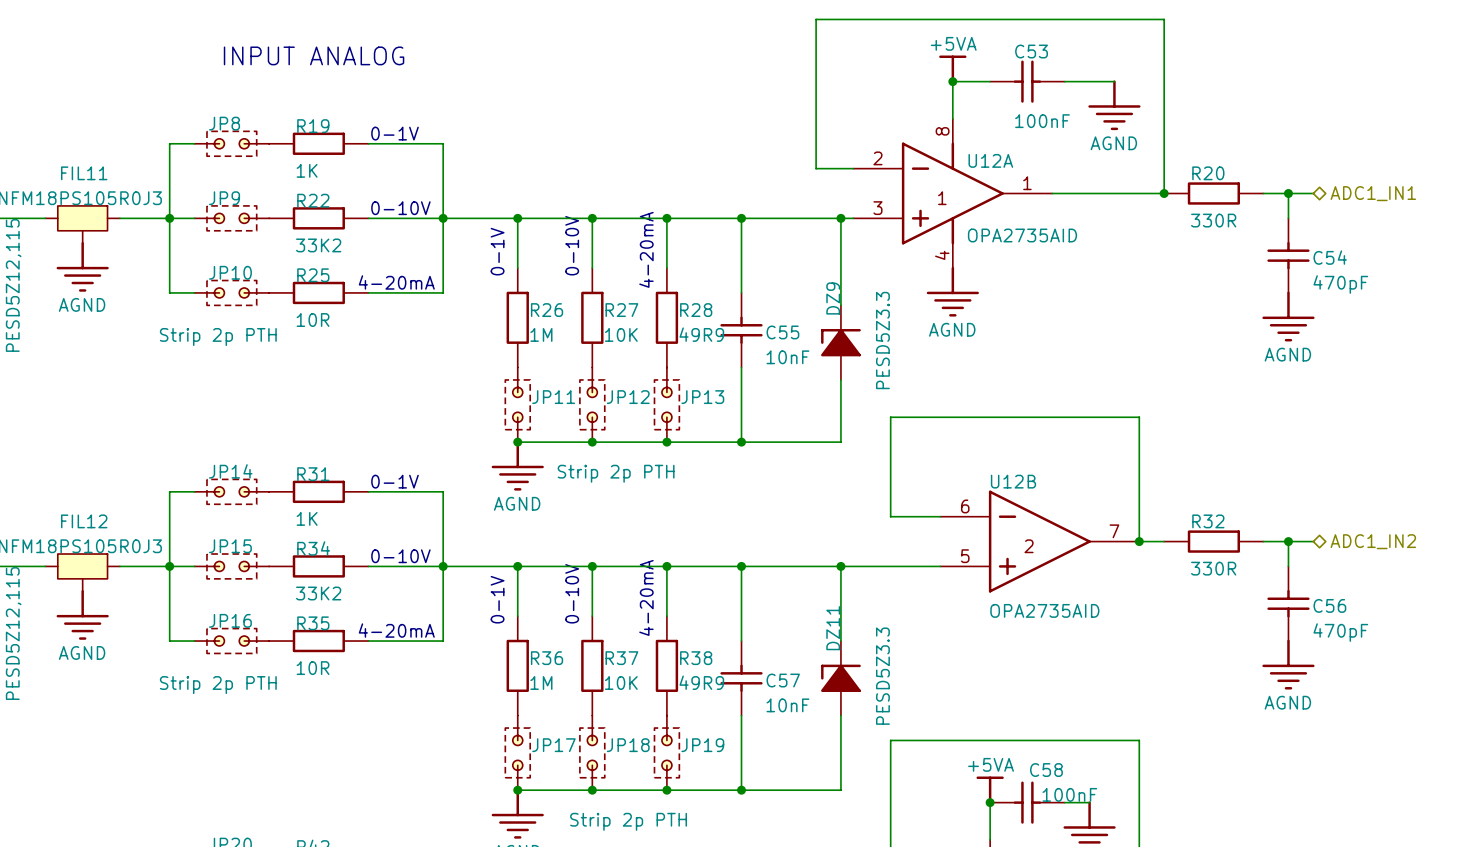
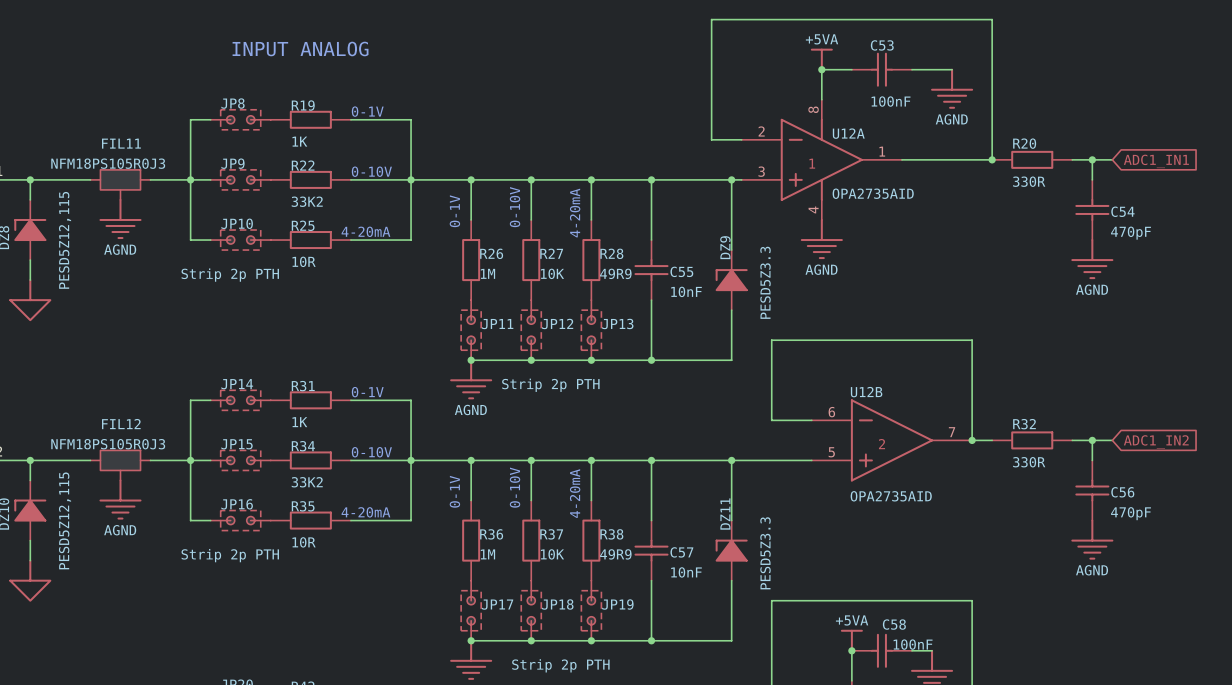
hierarchical label: ADC1_IN1 (1373, 193) -> none
global label: none -> ADC1_IN1 (1156, 161)
hierarchical label: ADC1_IN2 (1373, 541) -> none
global label: none -> ADC1_IN2 (1156, 441)

